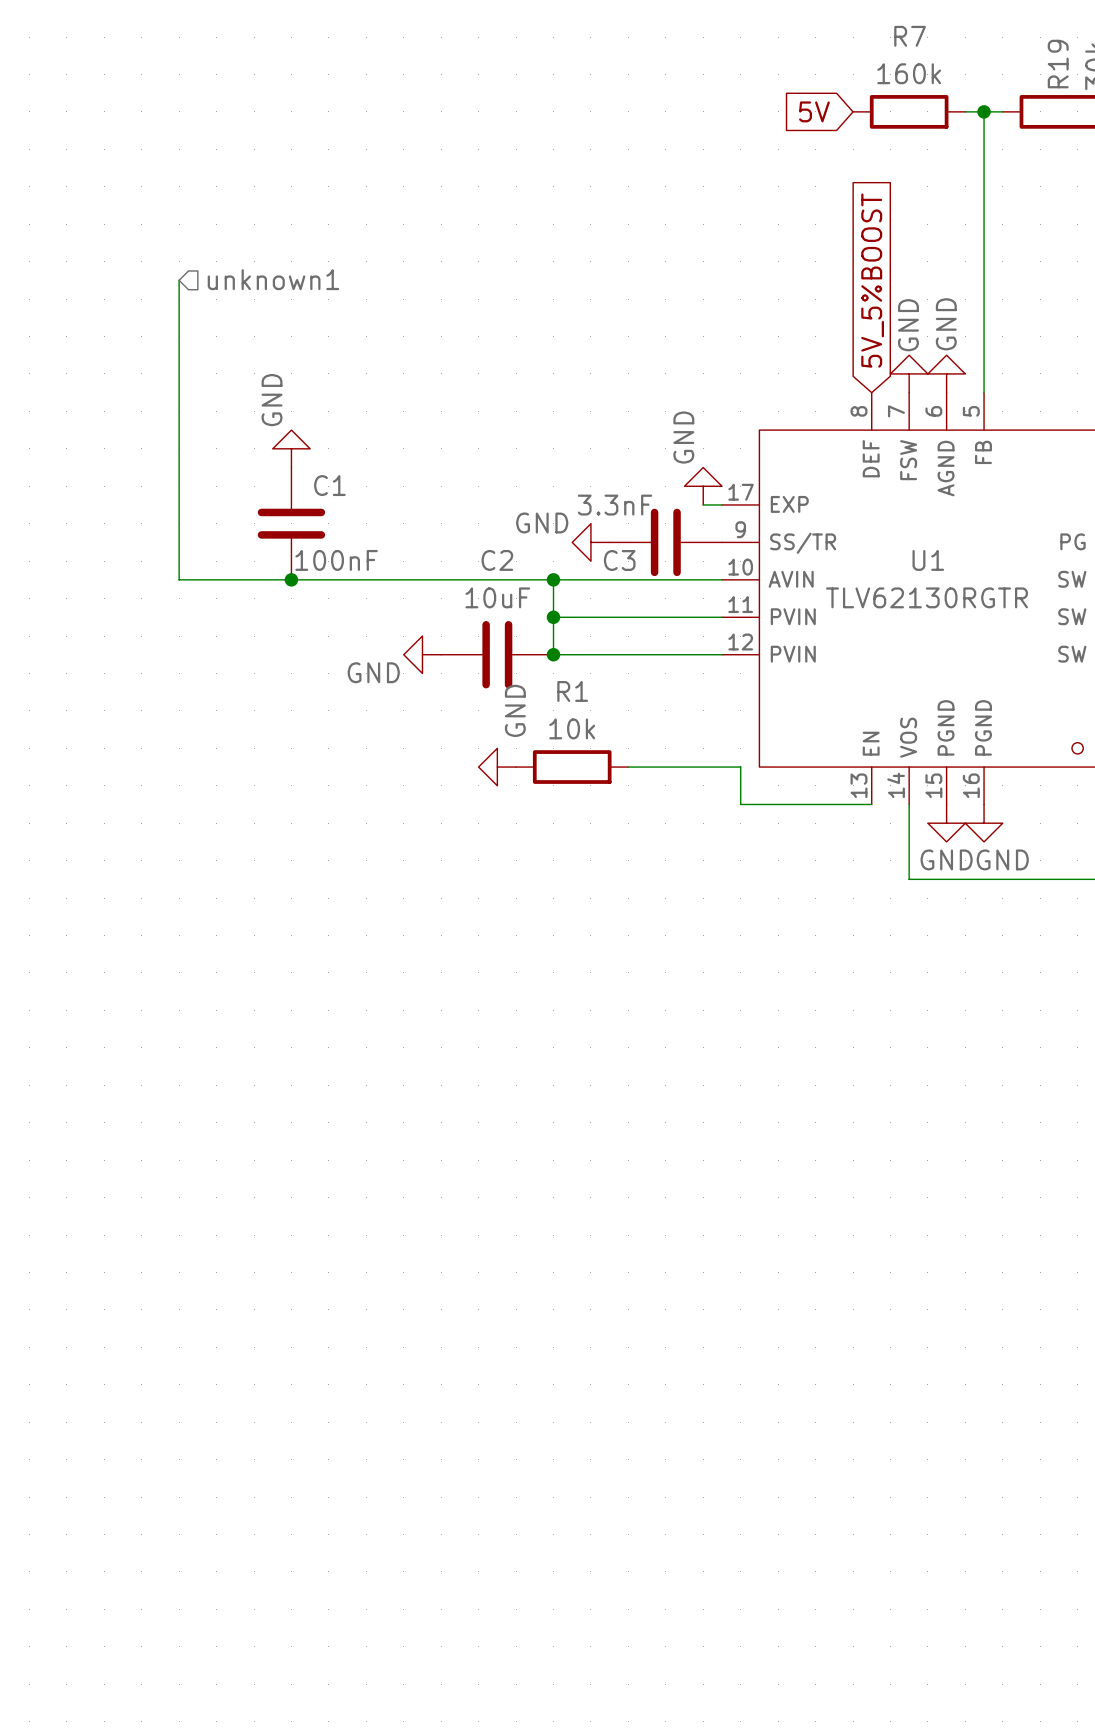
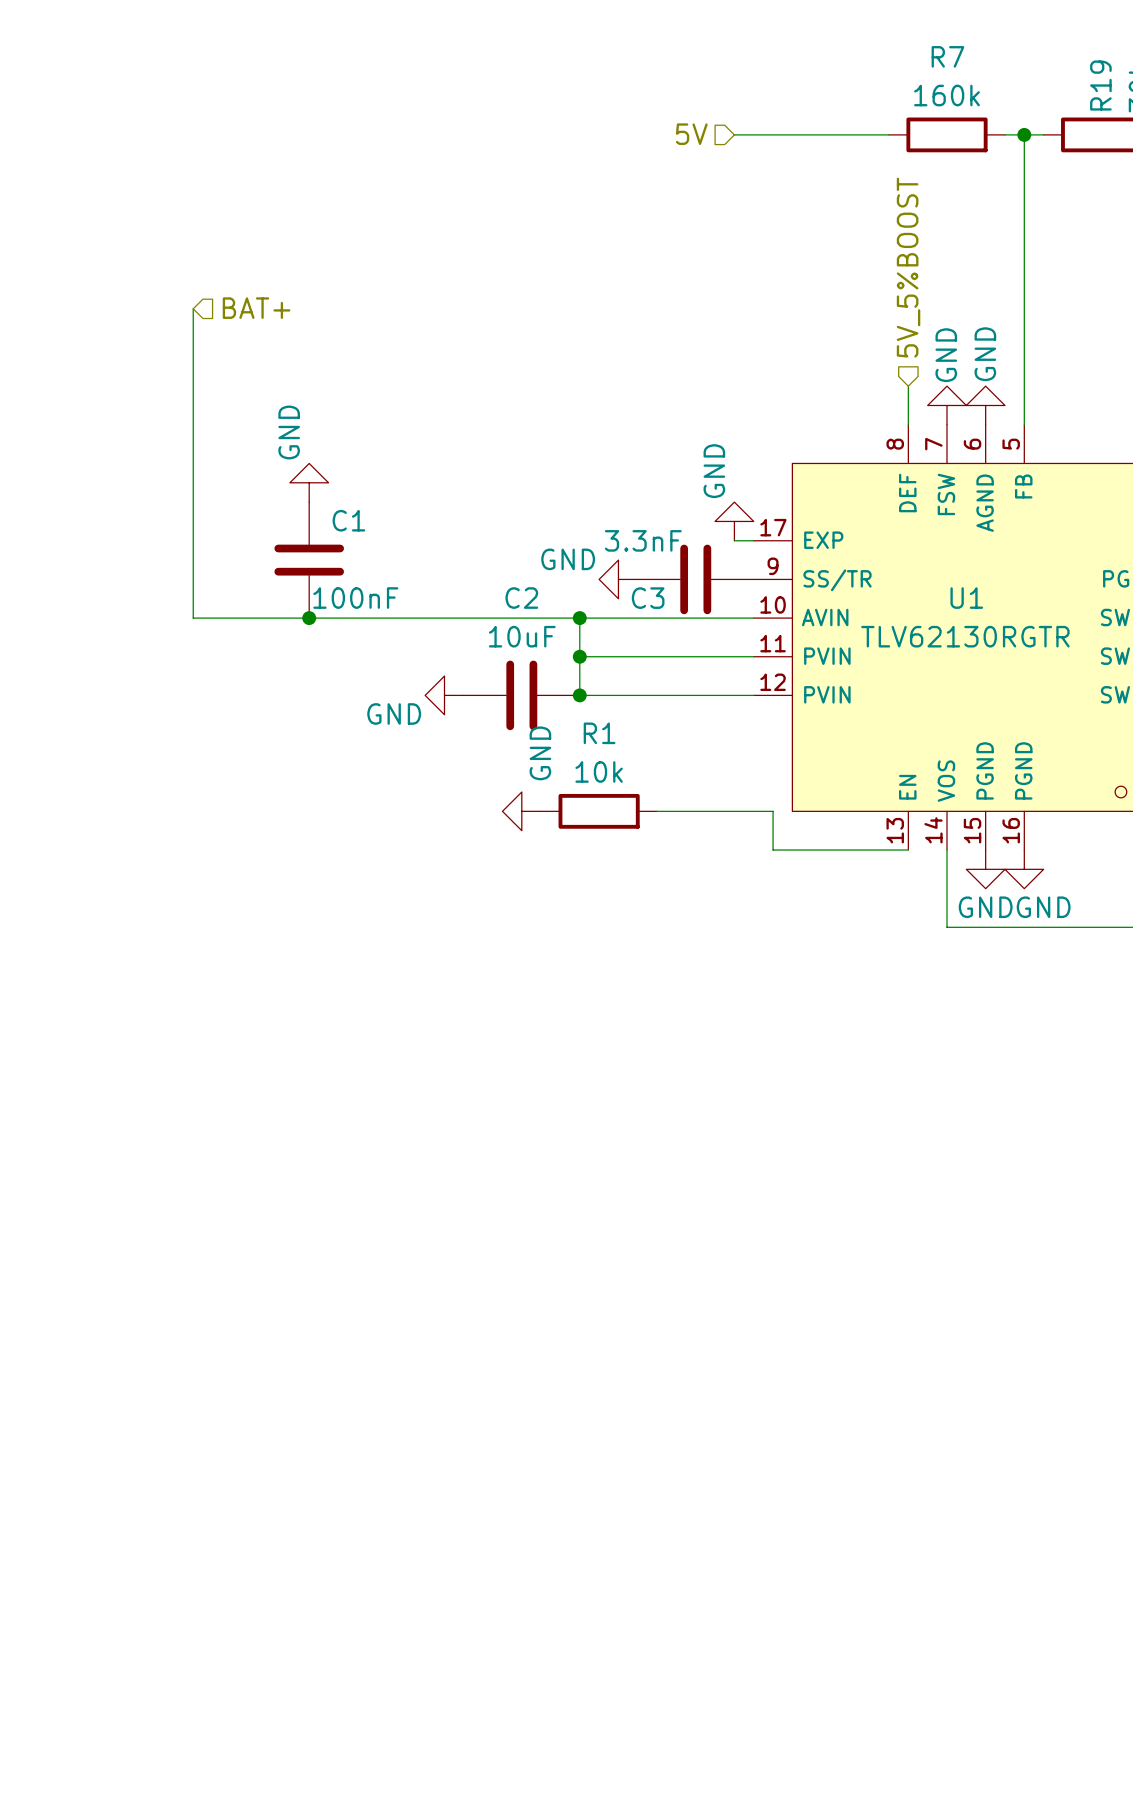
hierarchical label: none -> 5V (691, 134)
wire: none -> (734, 134) (889, 134)
global label: 5V (814, 111) -> none
hierarchical label: none -> 5V_5%BOOST (908, 267)
hierarchical label: unknown1 (273, 279) -> BAT+ (256, 308)
global label: 5V_5%BOOST (872, 280) -> none
wire: none -> (908, 386) (908, 424)

